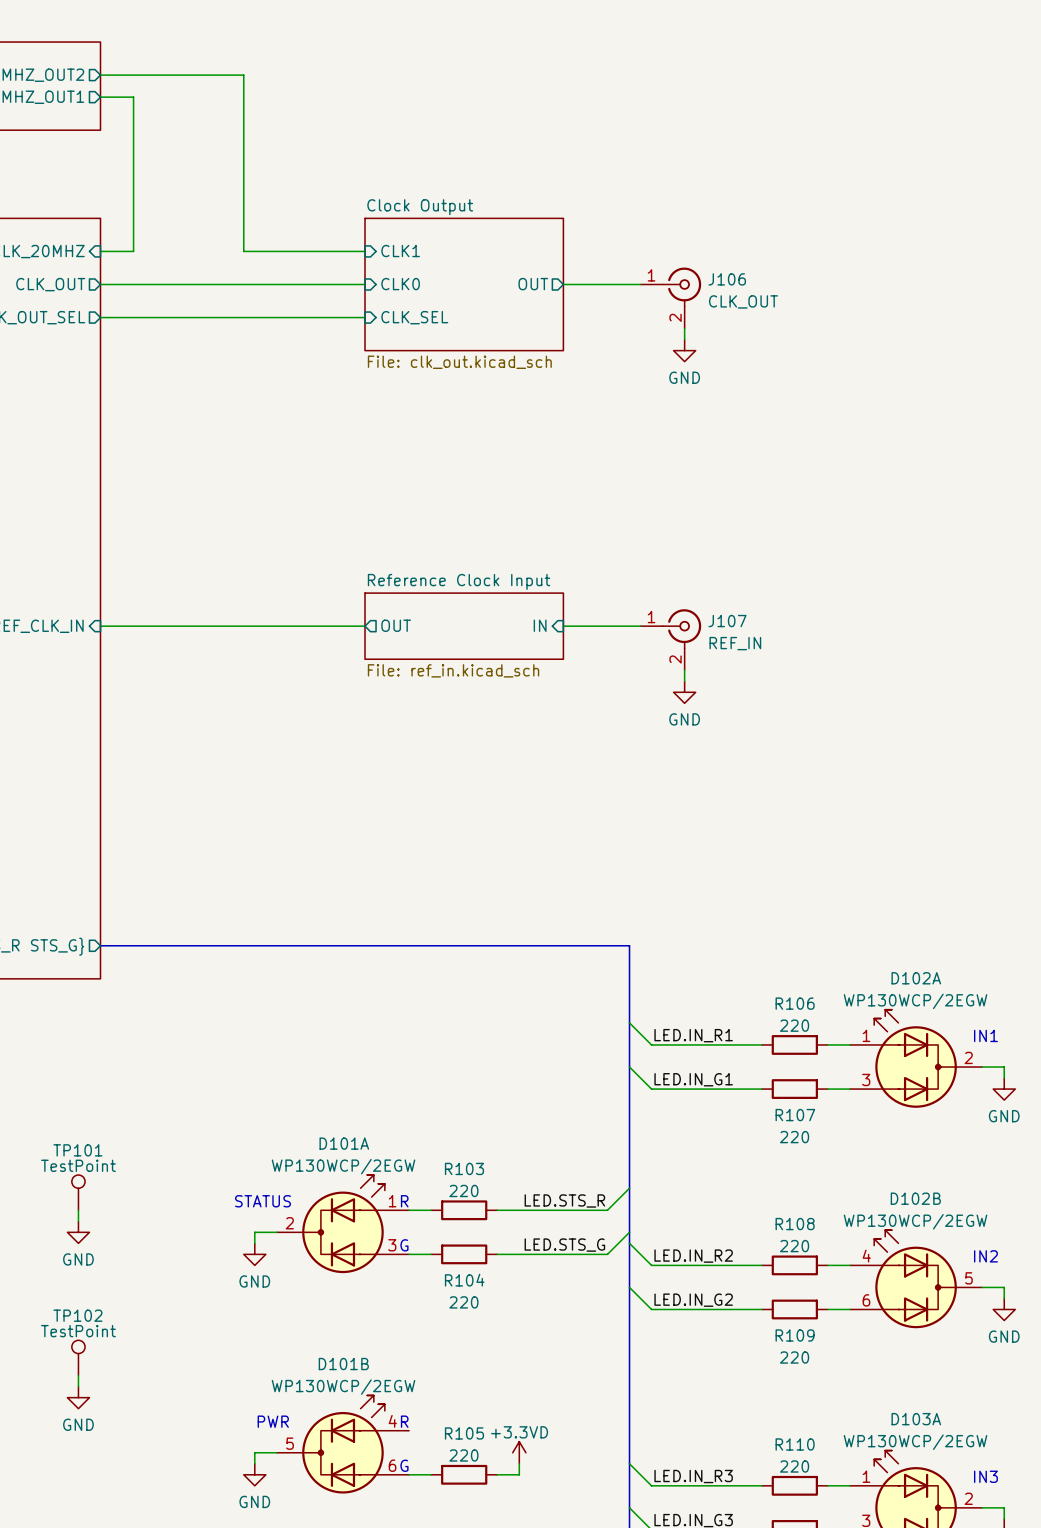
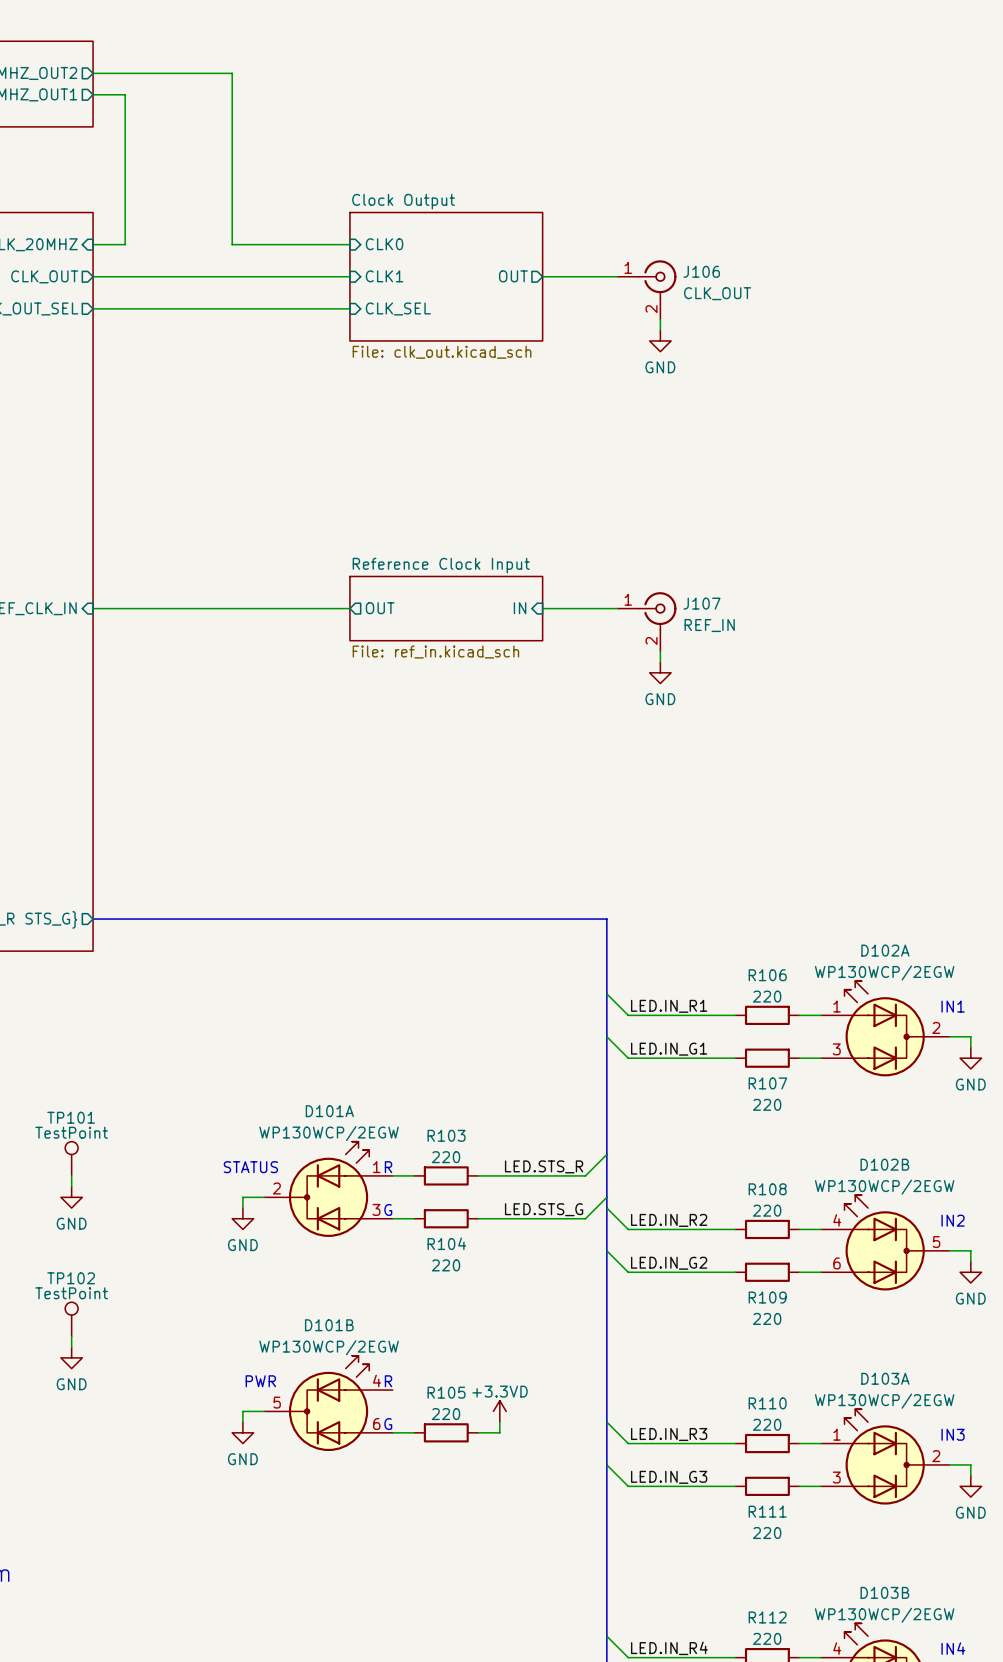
sheet pin: CLK1 (400, 251) -> CLK0 (384, 244)
sheet pin: CLK0 (400, 284) -> CLK1 (384, 276)

